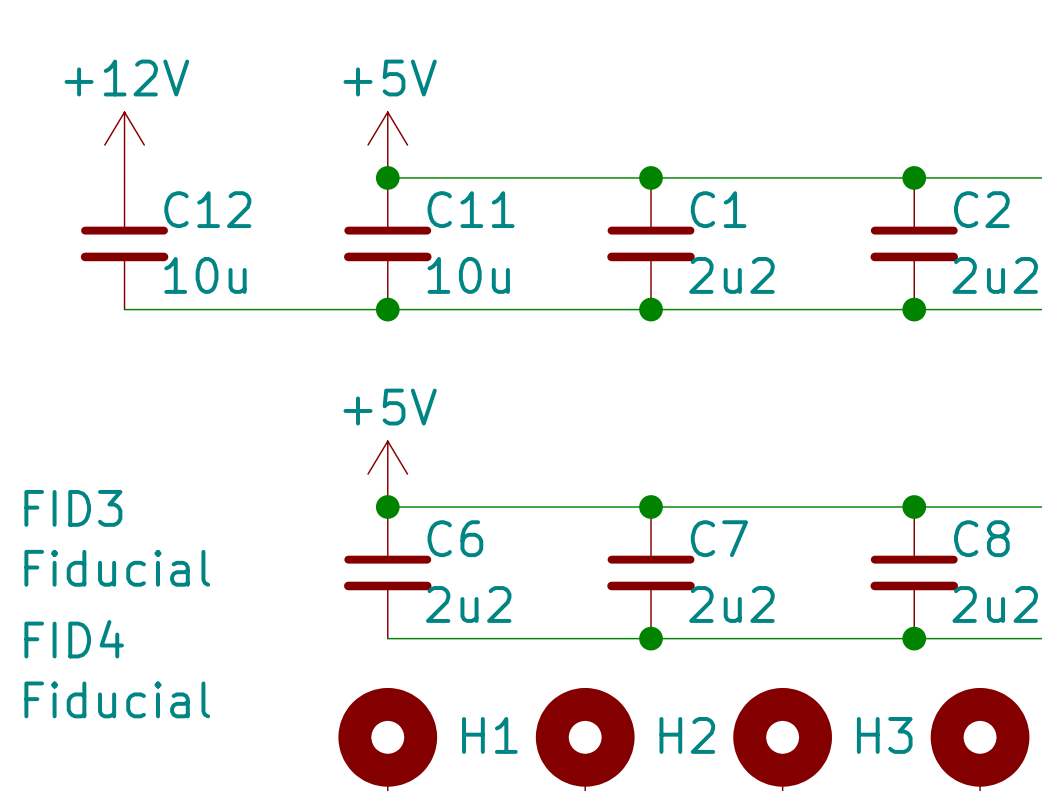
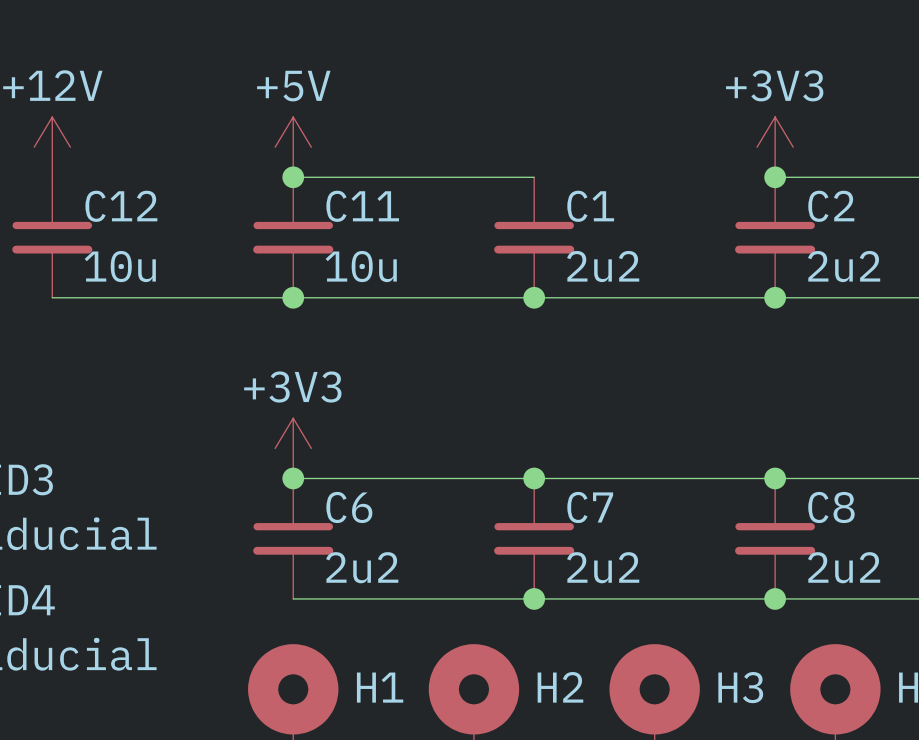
power symbol: none -> +3V3 (775, 147)
wire: (651, 177) (914, 177) -> none
junction: (651, 177) -> none
power symbol: +5V (387, 474) -> +3V3 (293, 448)

